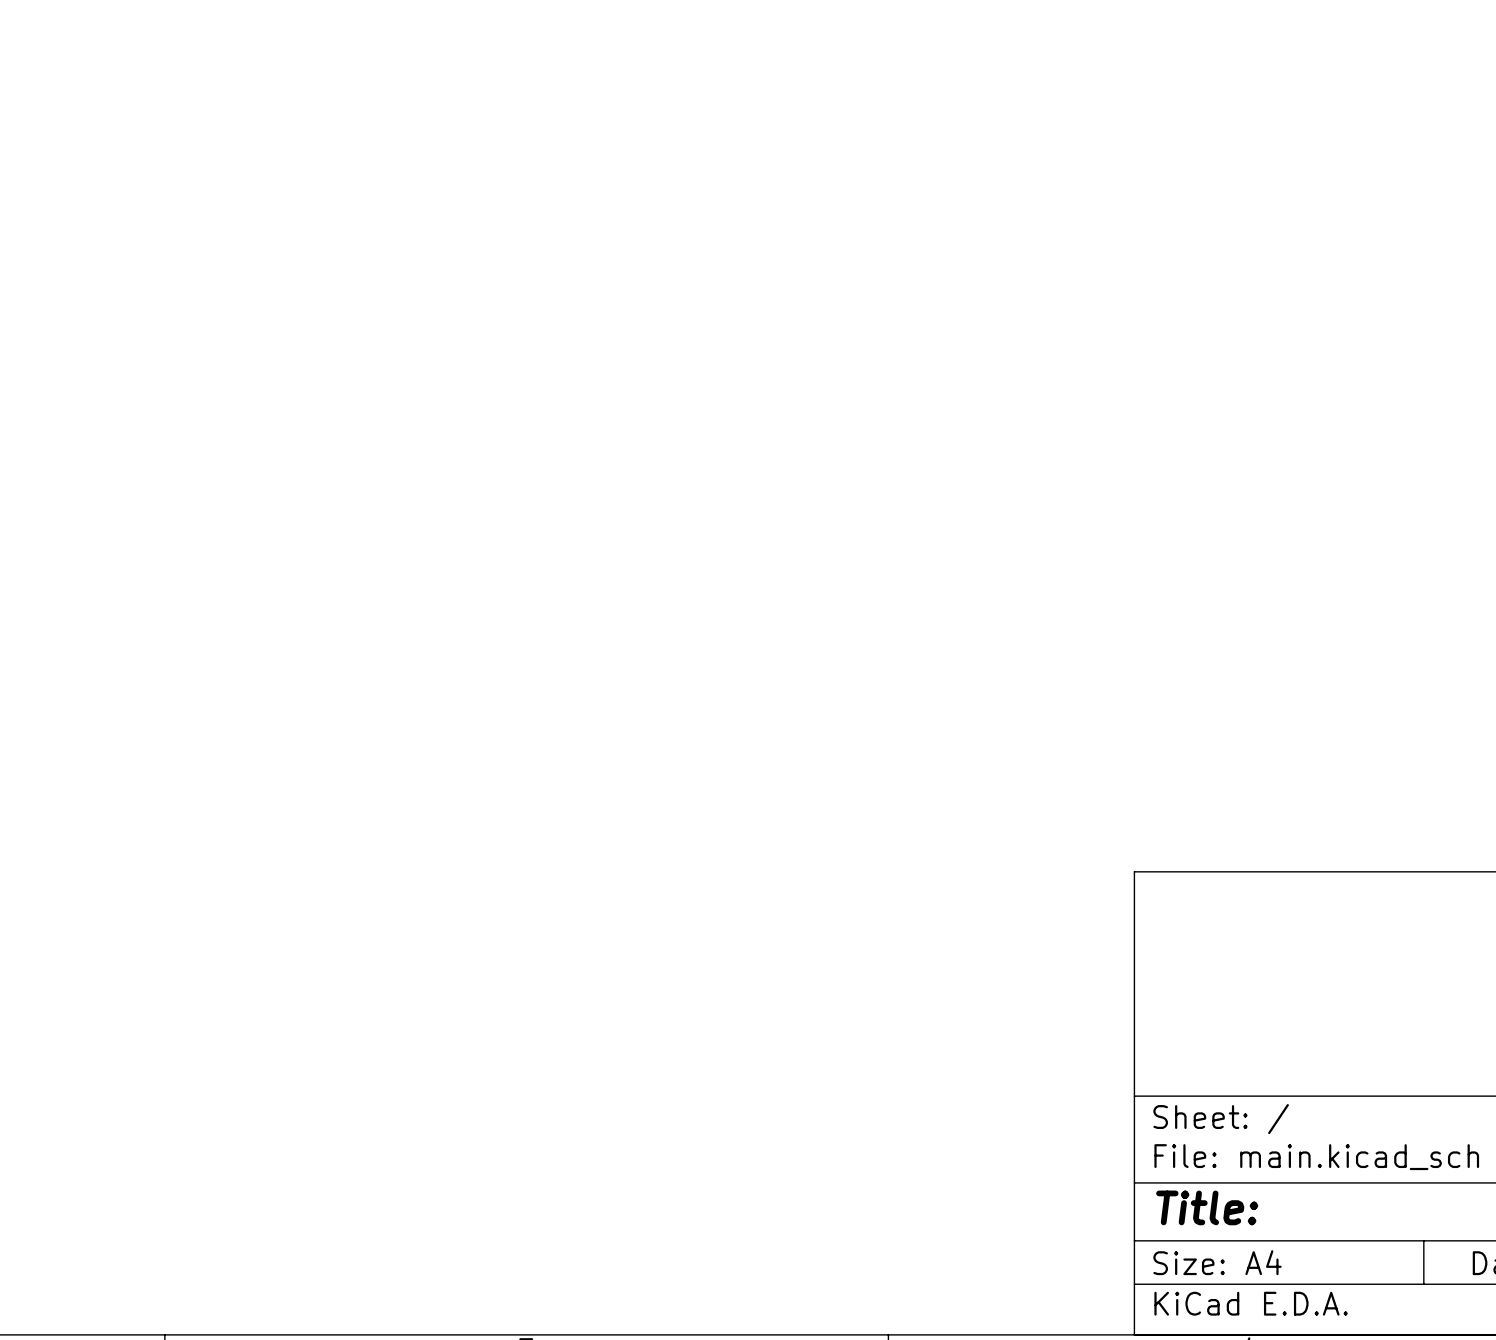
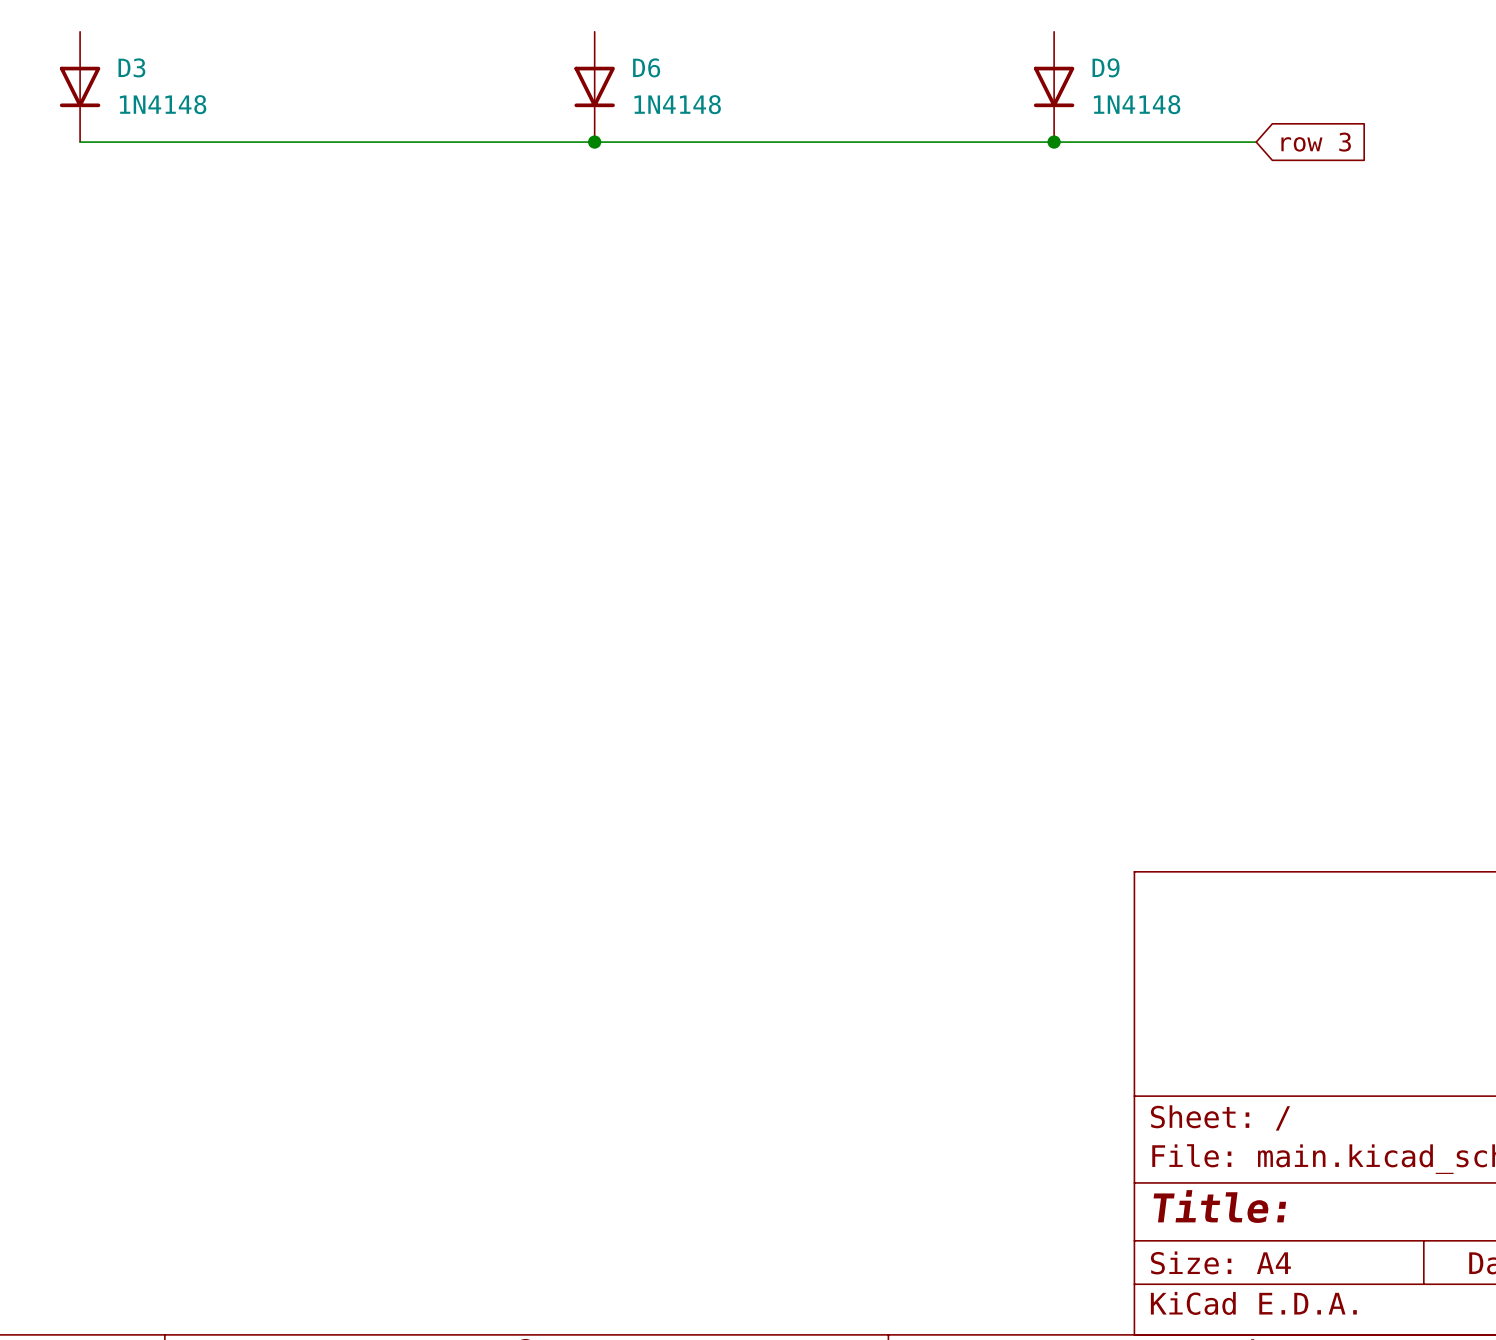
D3: none -> 1N4148 (80, 86)
D6: none -> 1N4148 (594, 86)
D9: none -> 1N4148 (1054, 86)
wire: none -> (80, 142) (1256, 142)
junction: none -> (594, 142)
junction: none -> (1054, 142)
global label: none -> row 3 (1316, 142)

